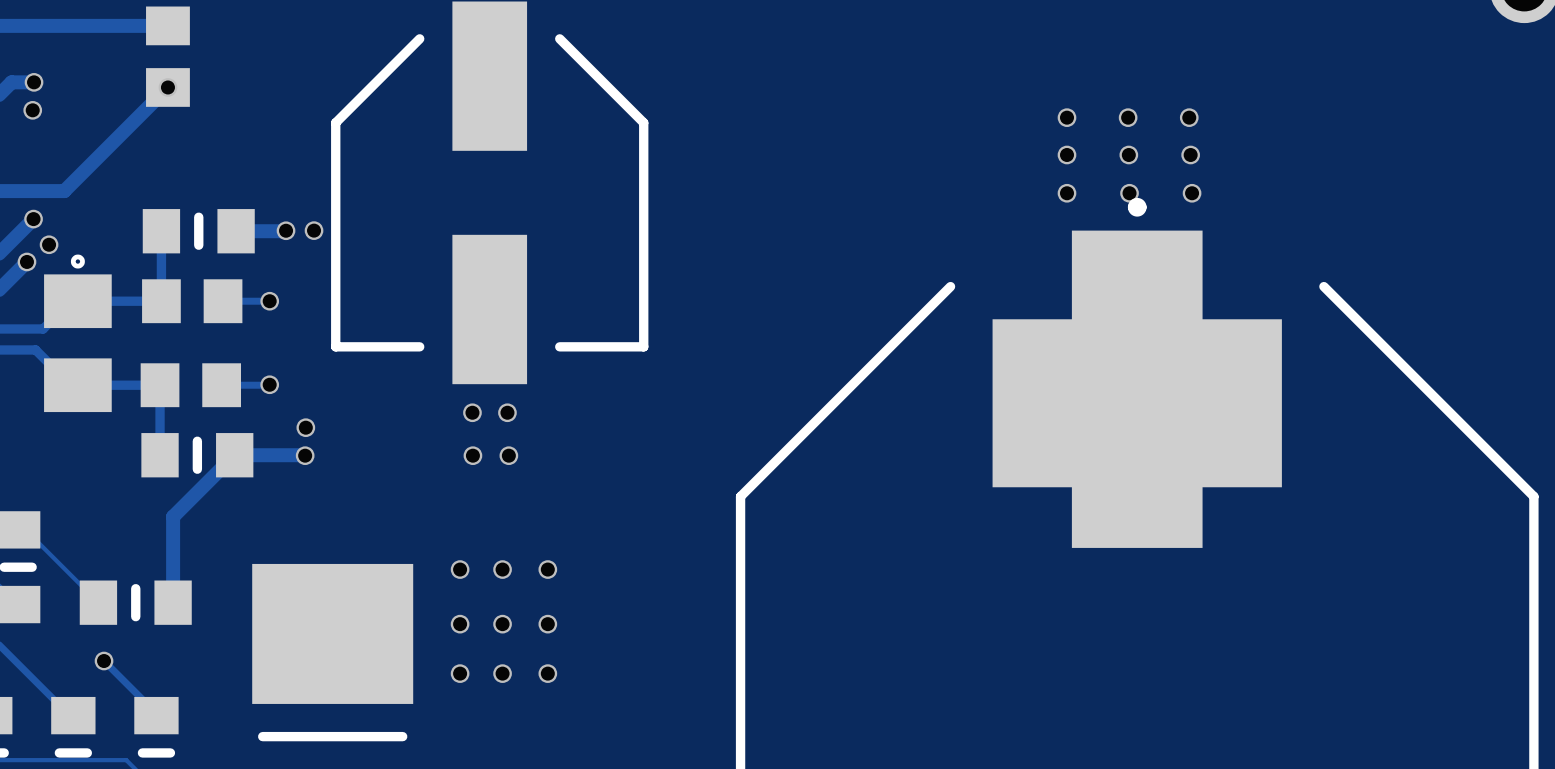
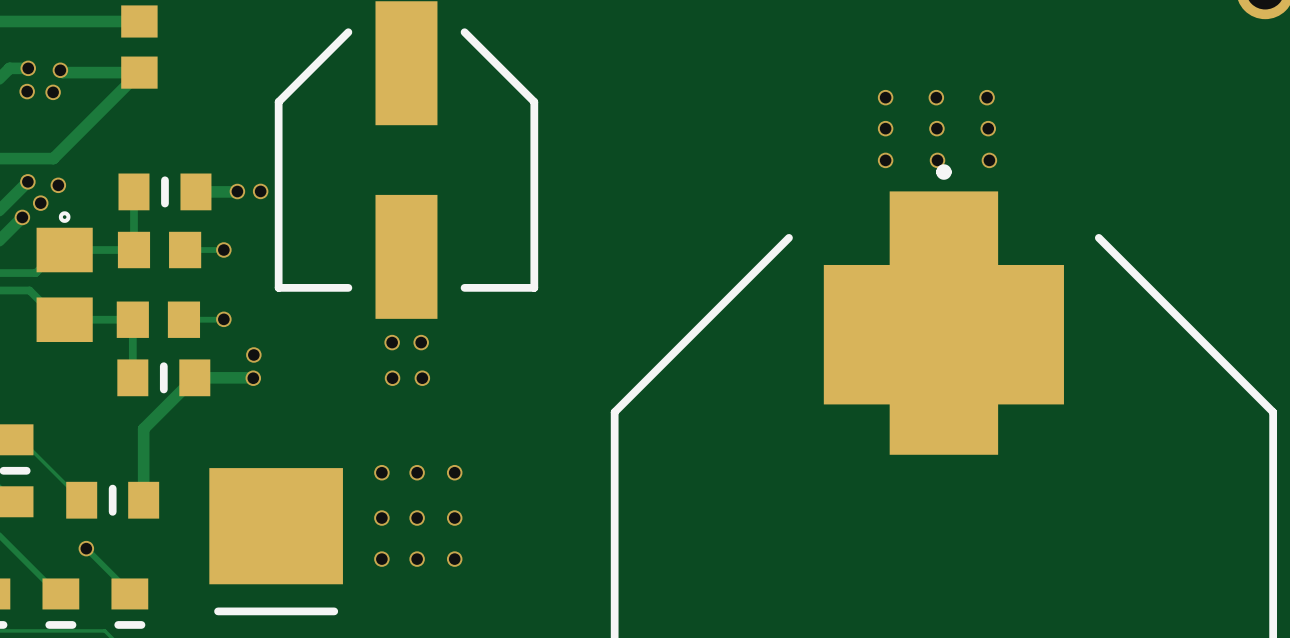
track: none -> (60, 70) (62, 72) (139, 72)
via: none -> (60, 70)
via: (167, 87) -> none
via: none -> (53, 92)
via: none -> (58, 185)

